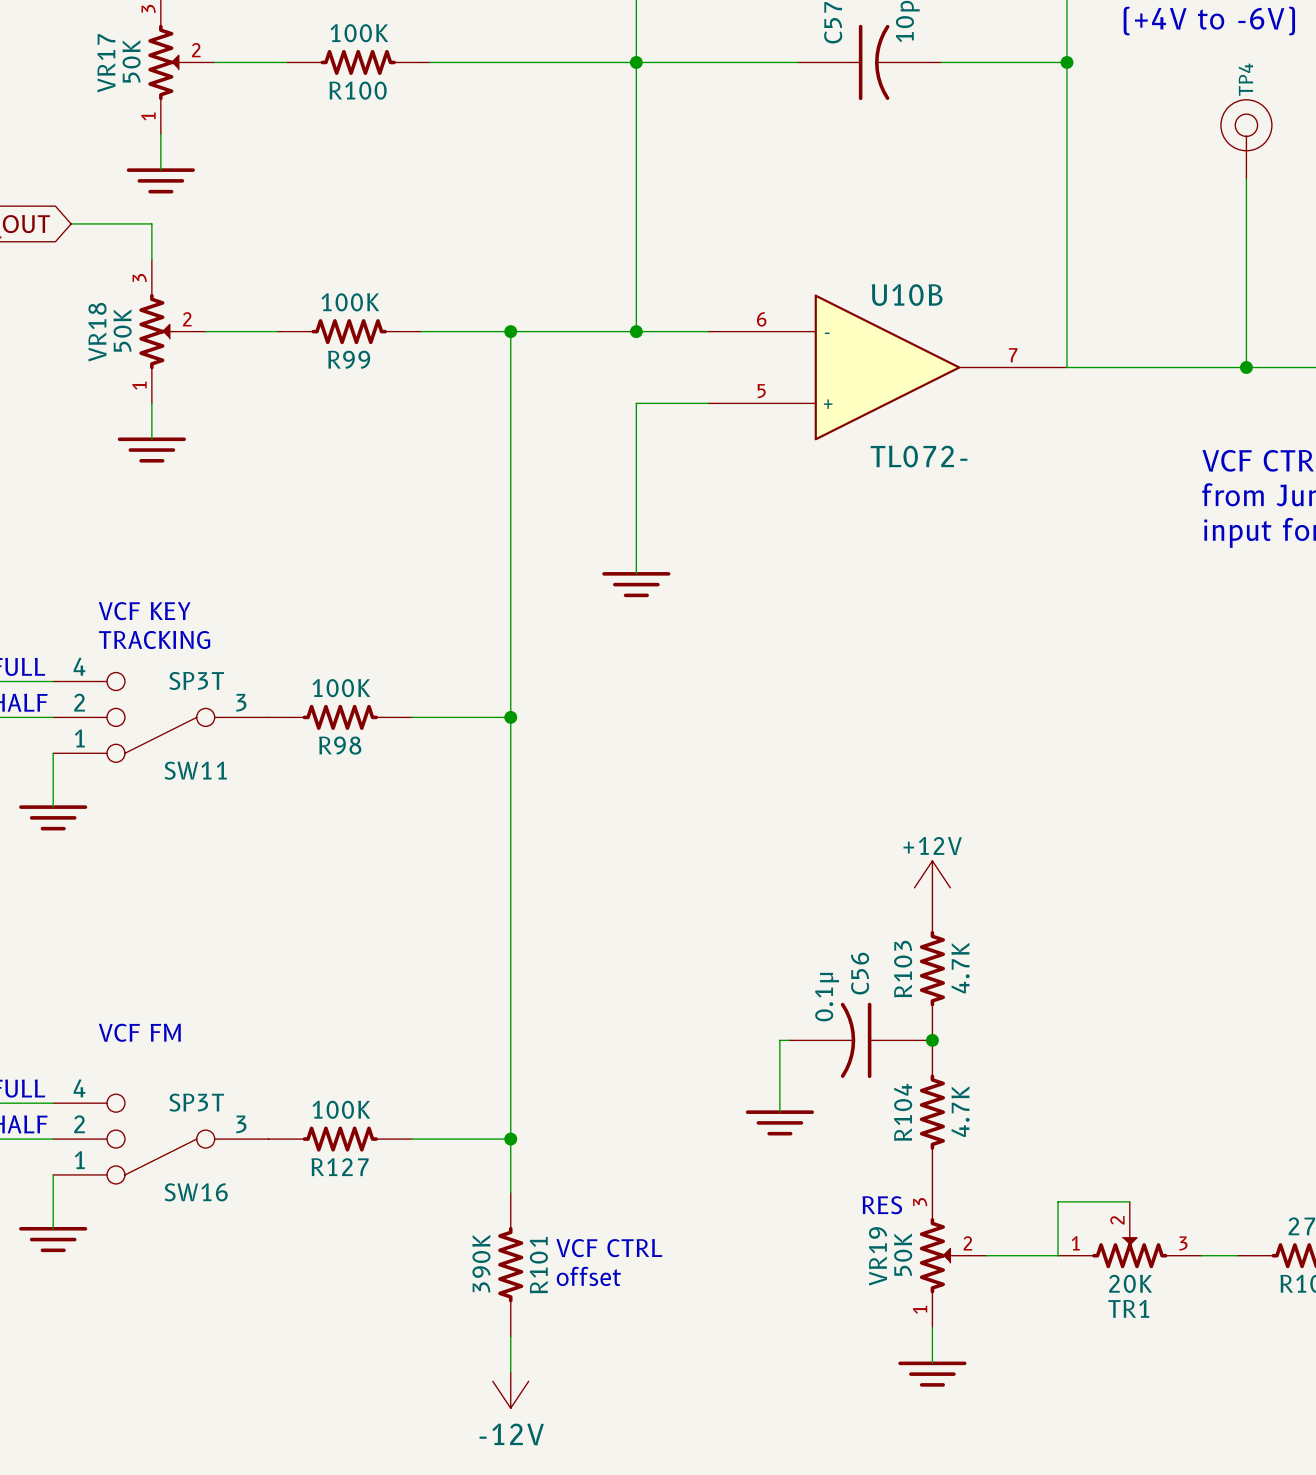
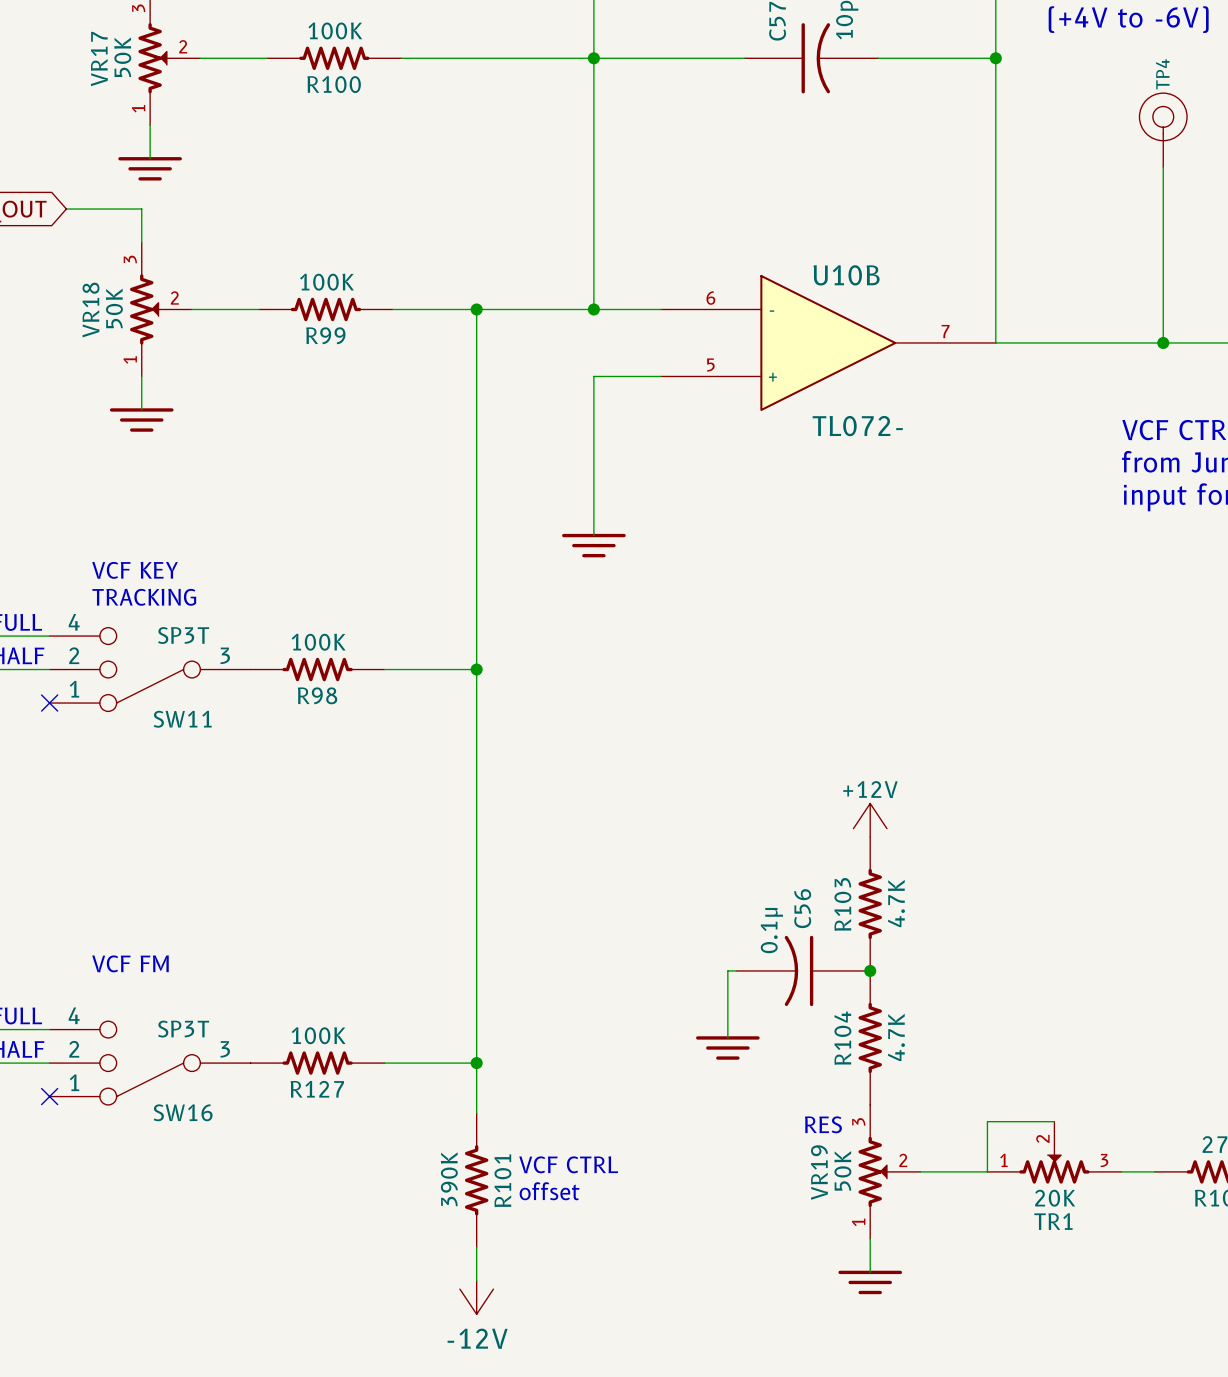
wire: (53, 753) (53, 807) -> none
no-connect mark: none -> (49, 703)
power symbol: (53, 817) -> none
wire: (53, 1174) (53, 1228) -> none
no-connect mark: none -> (49, 1096)
power symbol: (53, 1239) -> none

